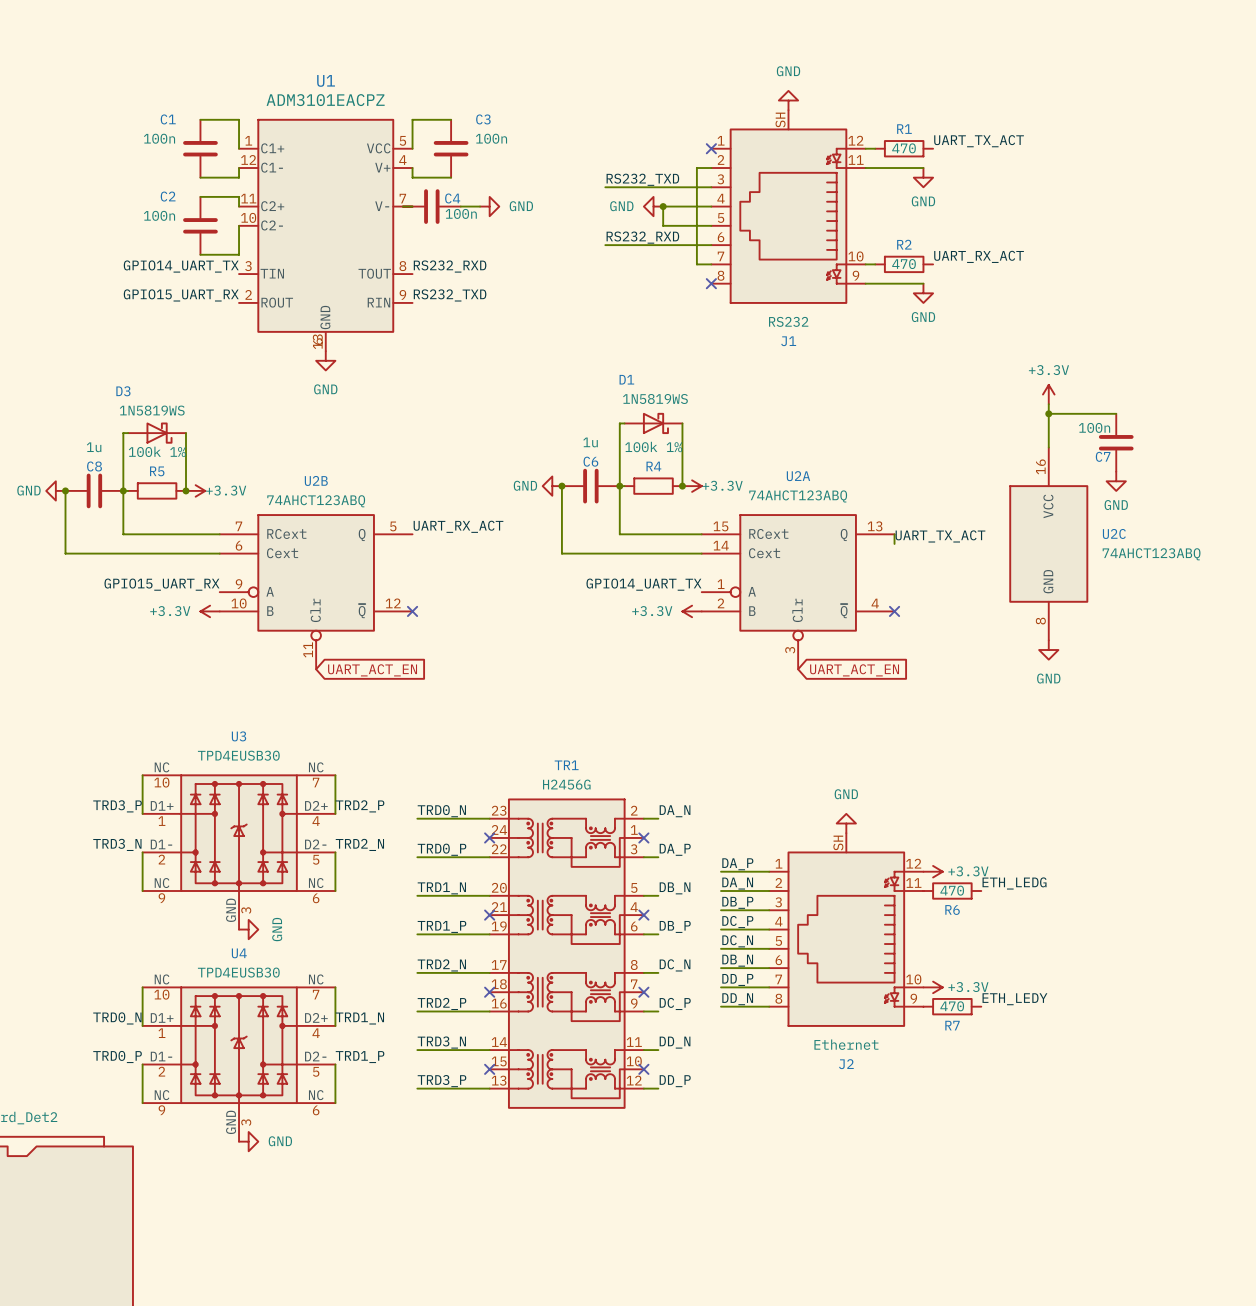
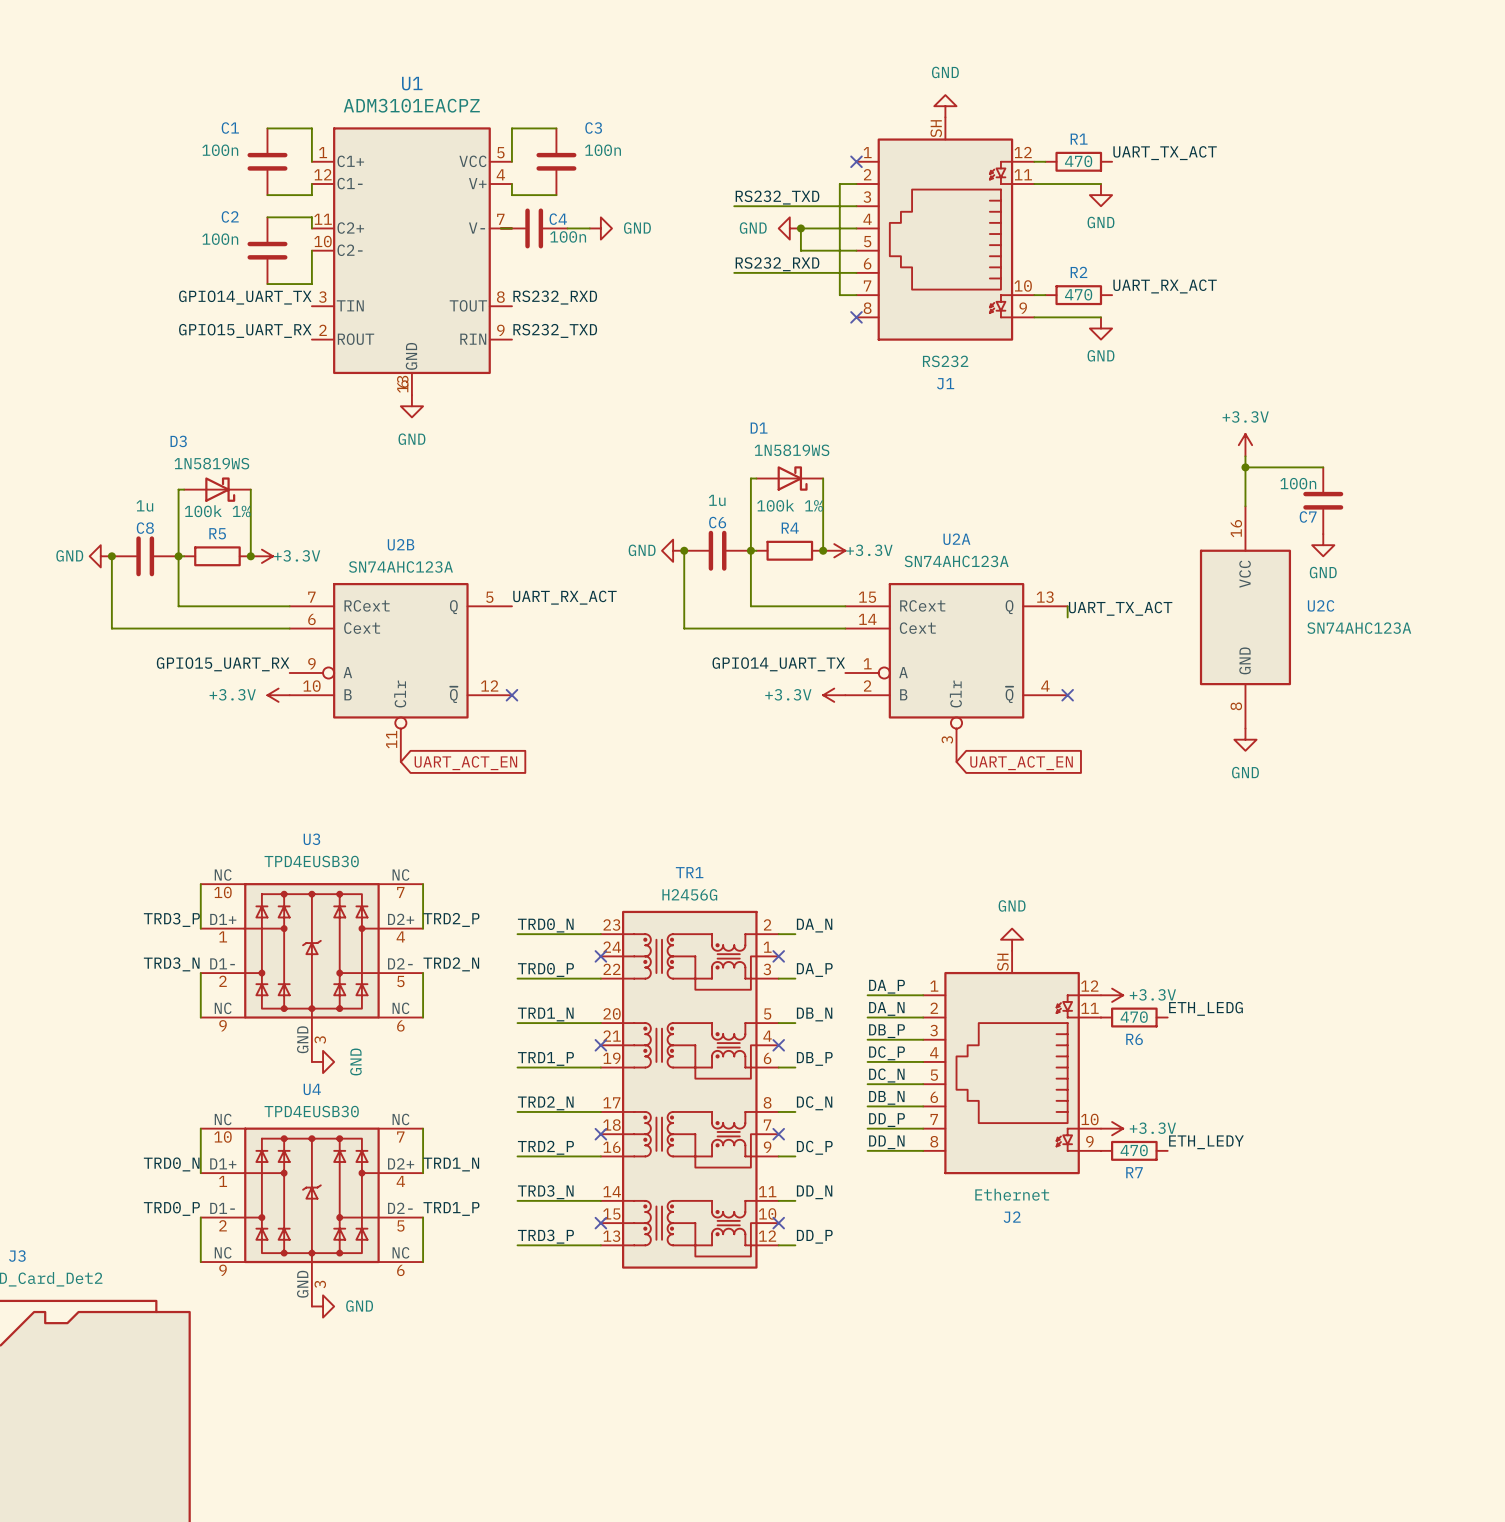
U2A value: 74AHCT123ABQ (798, 496) -> SN74AHC123A (956, 561)
U2B value: 74AHCT123ABQ (316, 501) -> SN74AHC123A (400, 567)
U2C value: 74AHCT123ABQ (1151, 554) -> SN74AHC123A (1359, 628)

